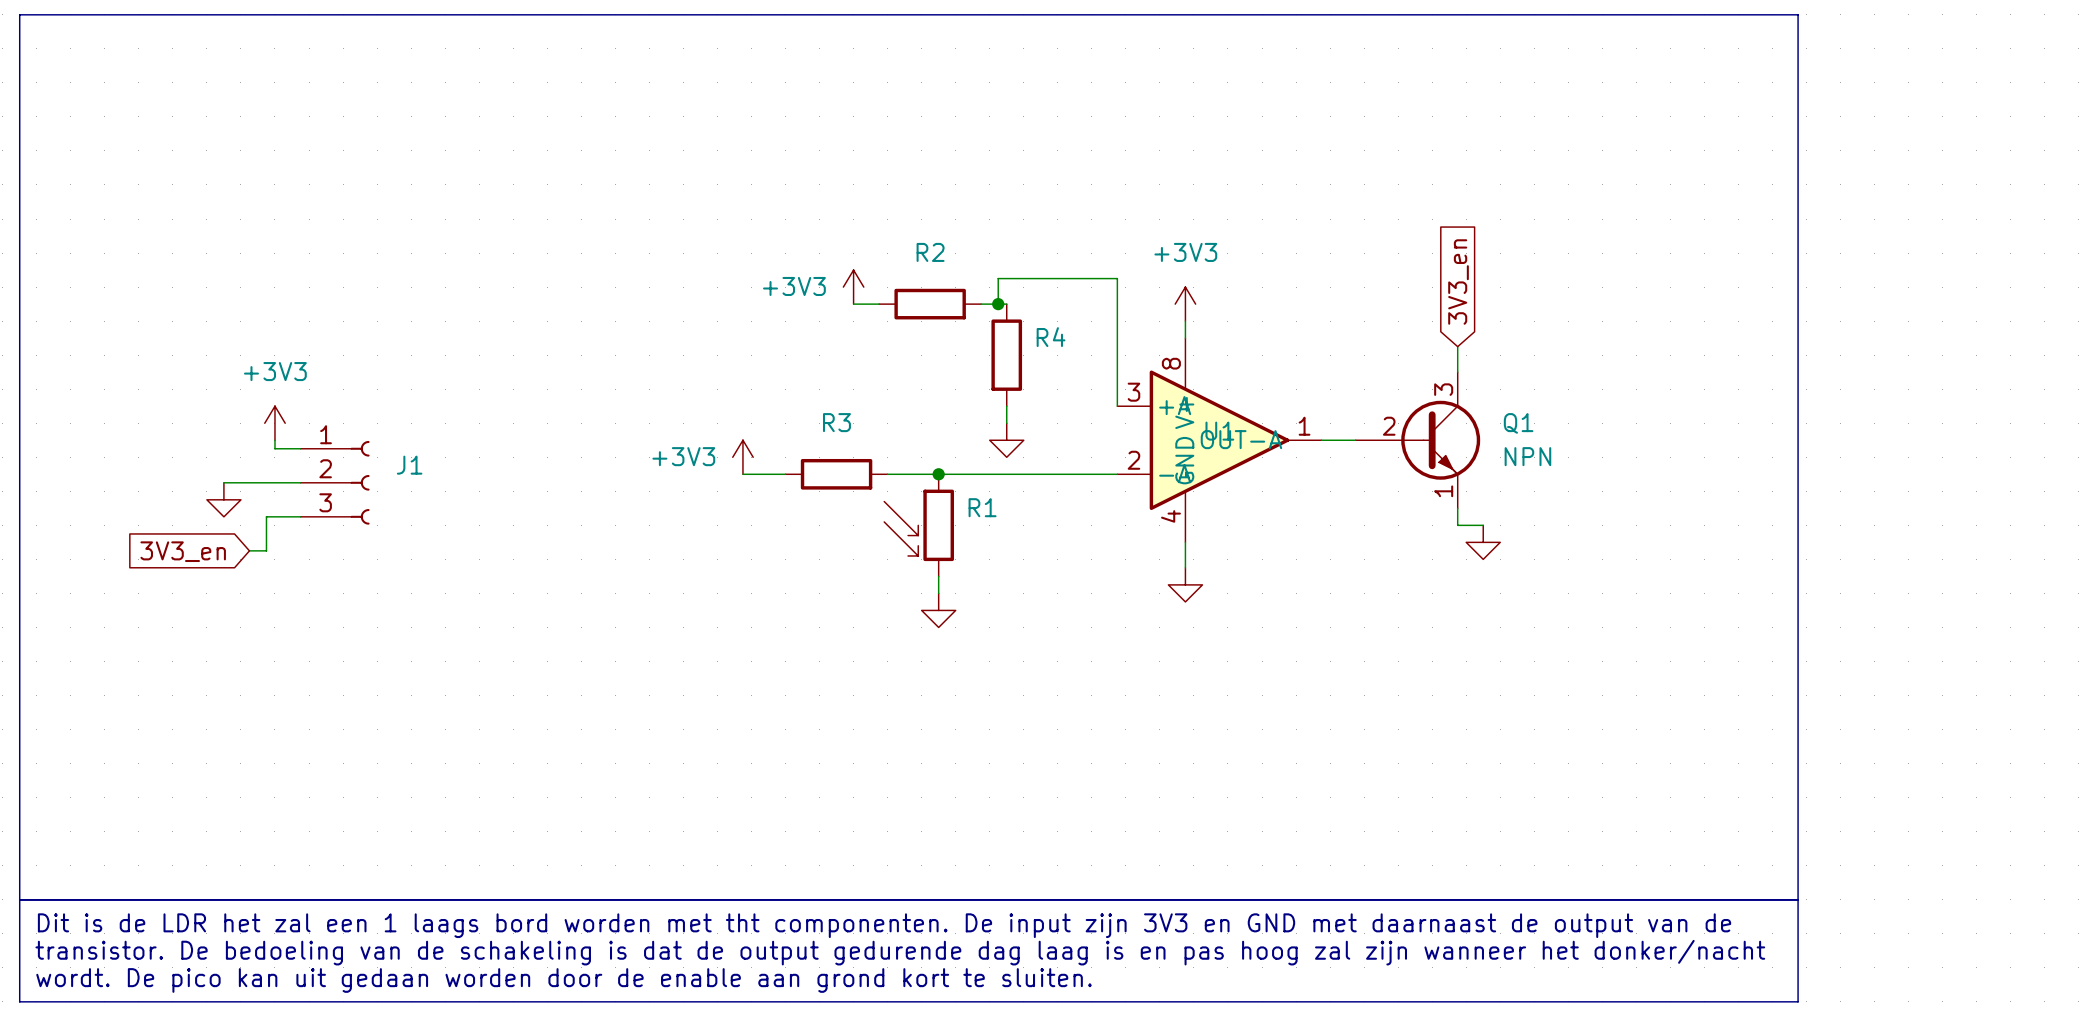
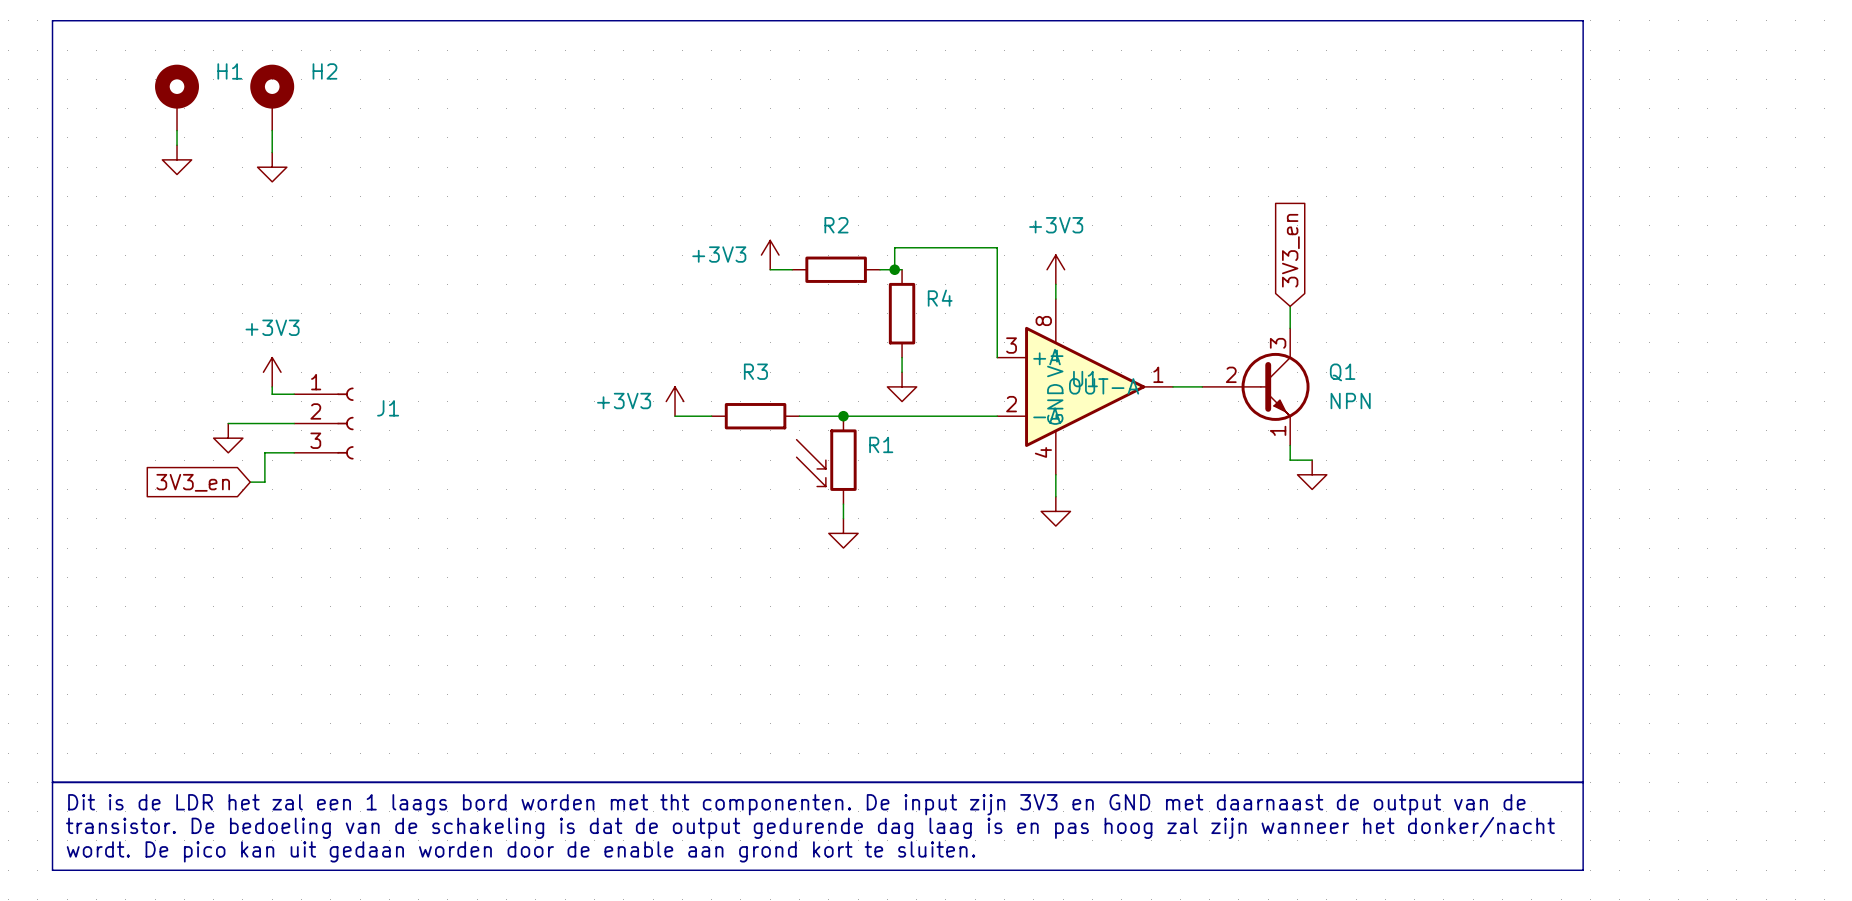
H1: none -> (177, 97)
H2: none -> (272, 97)
wire: none -> (177, 130) (177, 145)
wire: none -> (272, 130) (272, 152)
power symbol: none -> (177, 159)
power symbol: none -> (272, 167)

